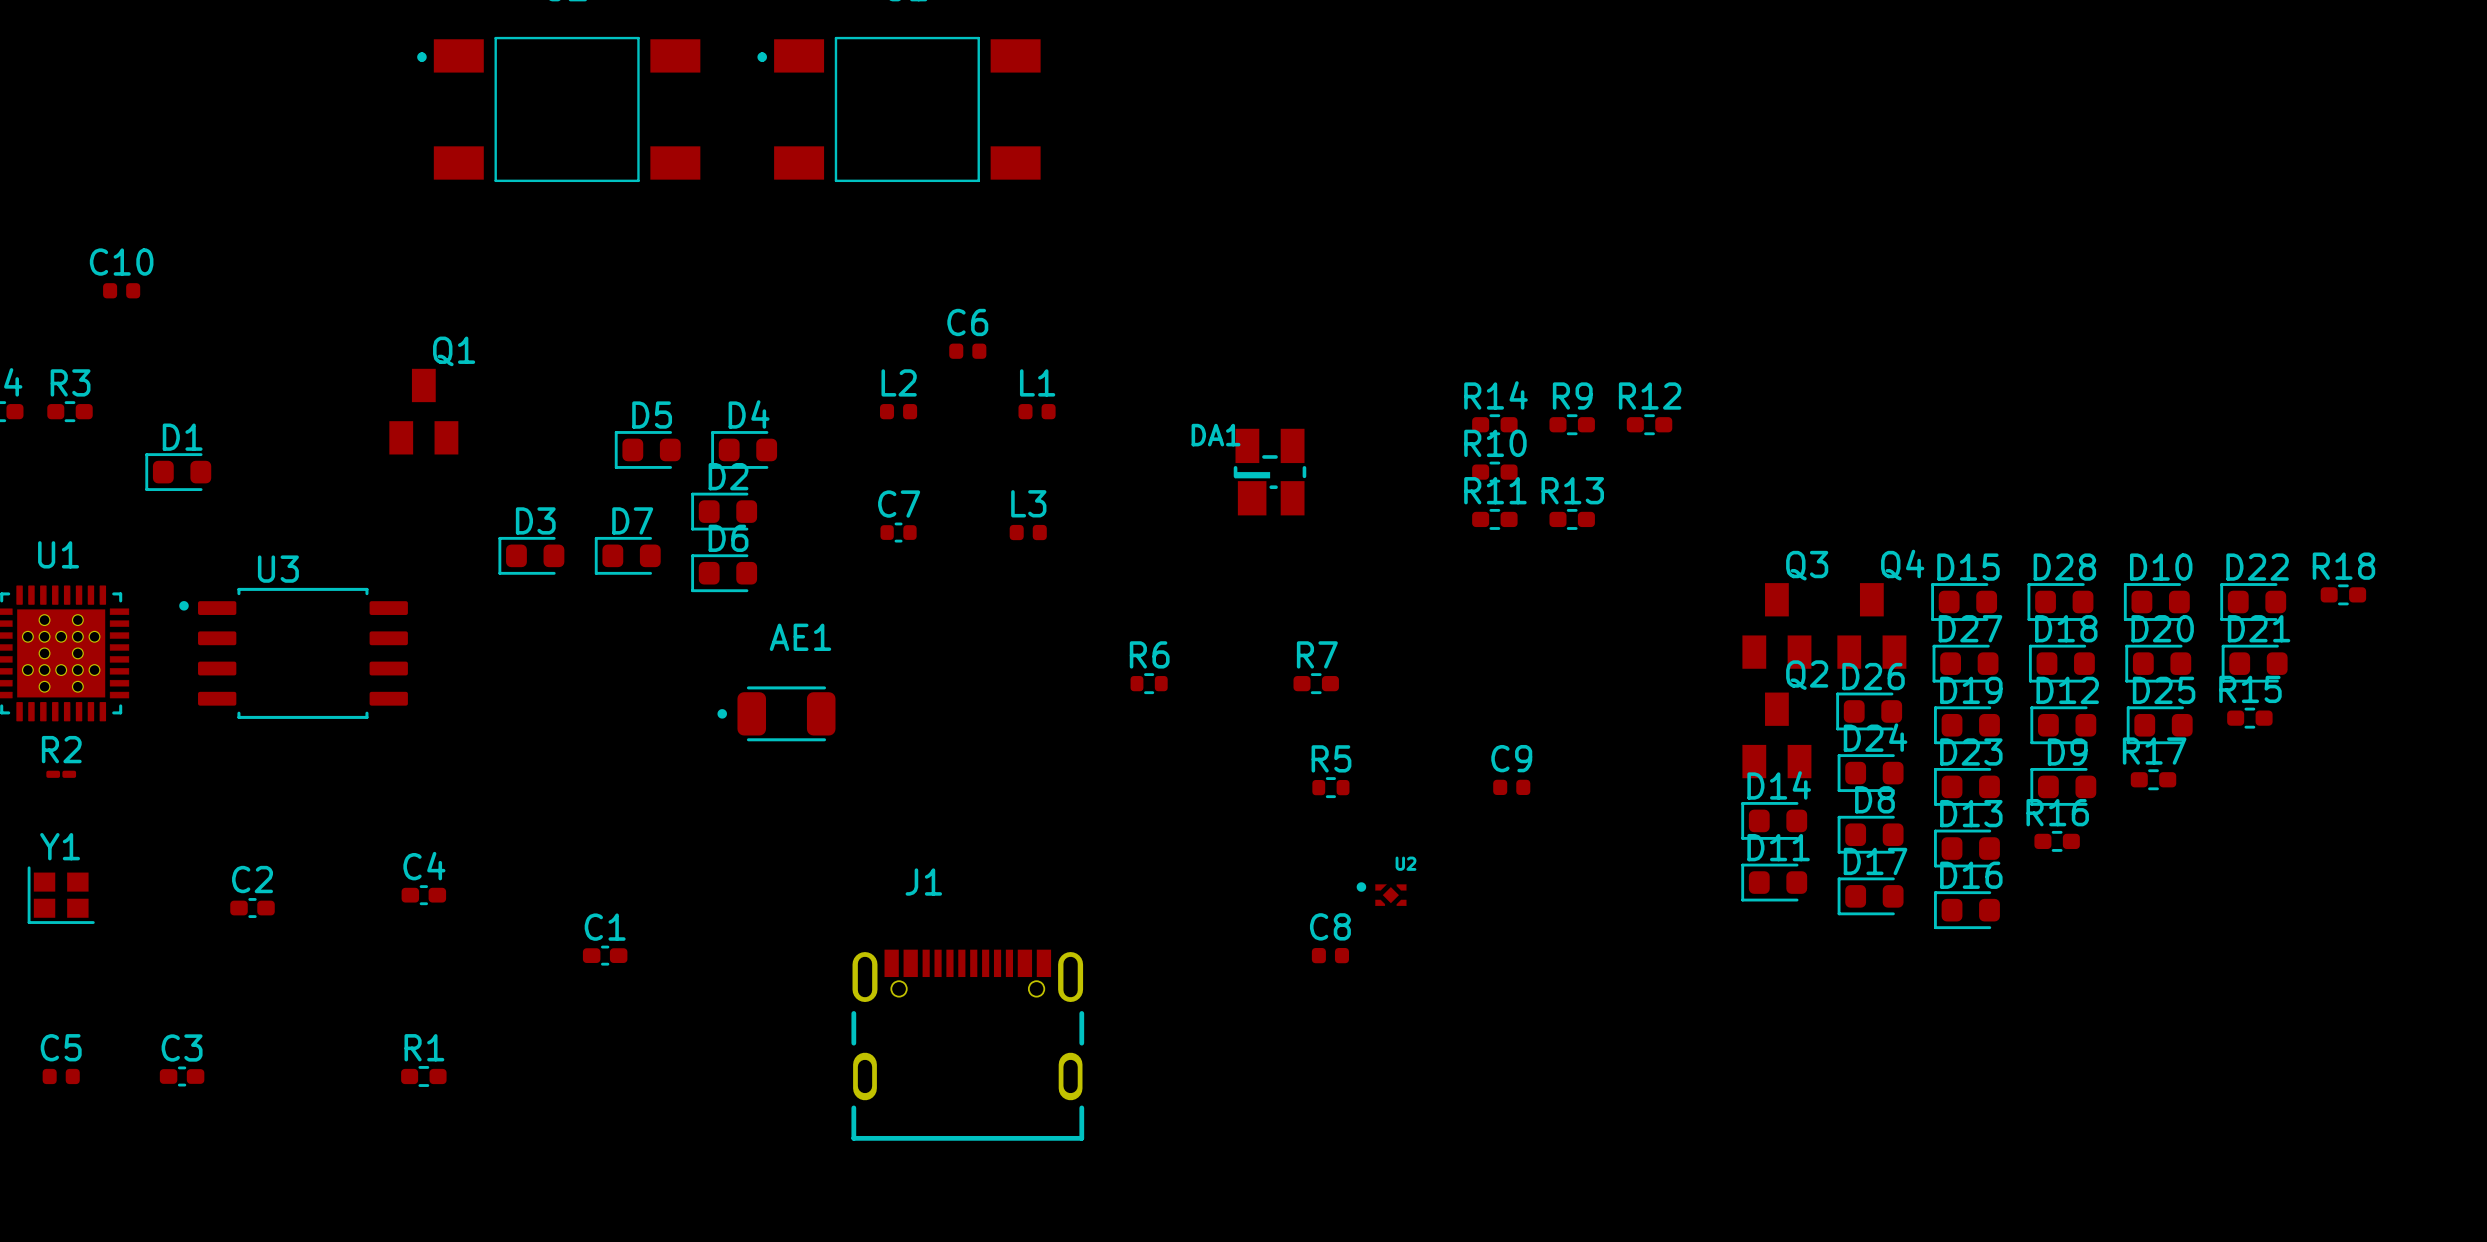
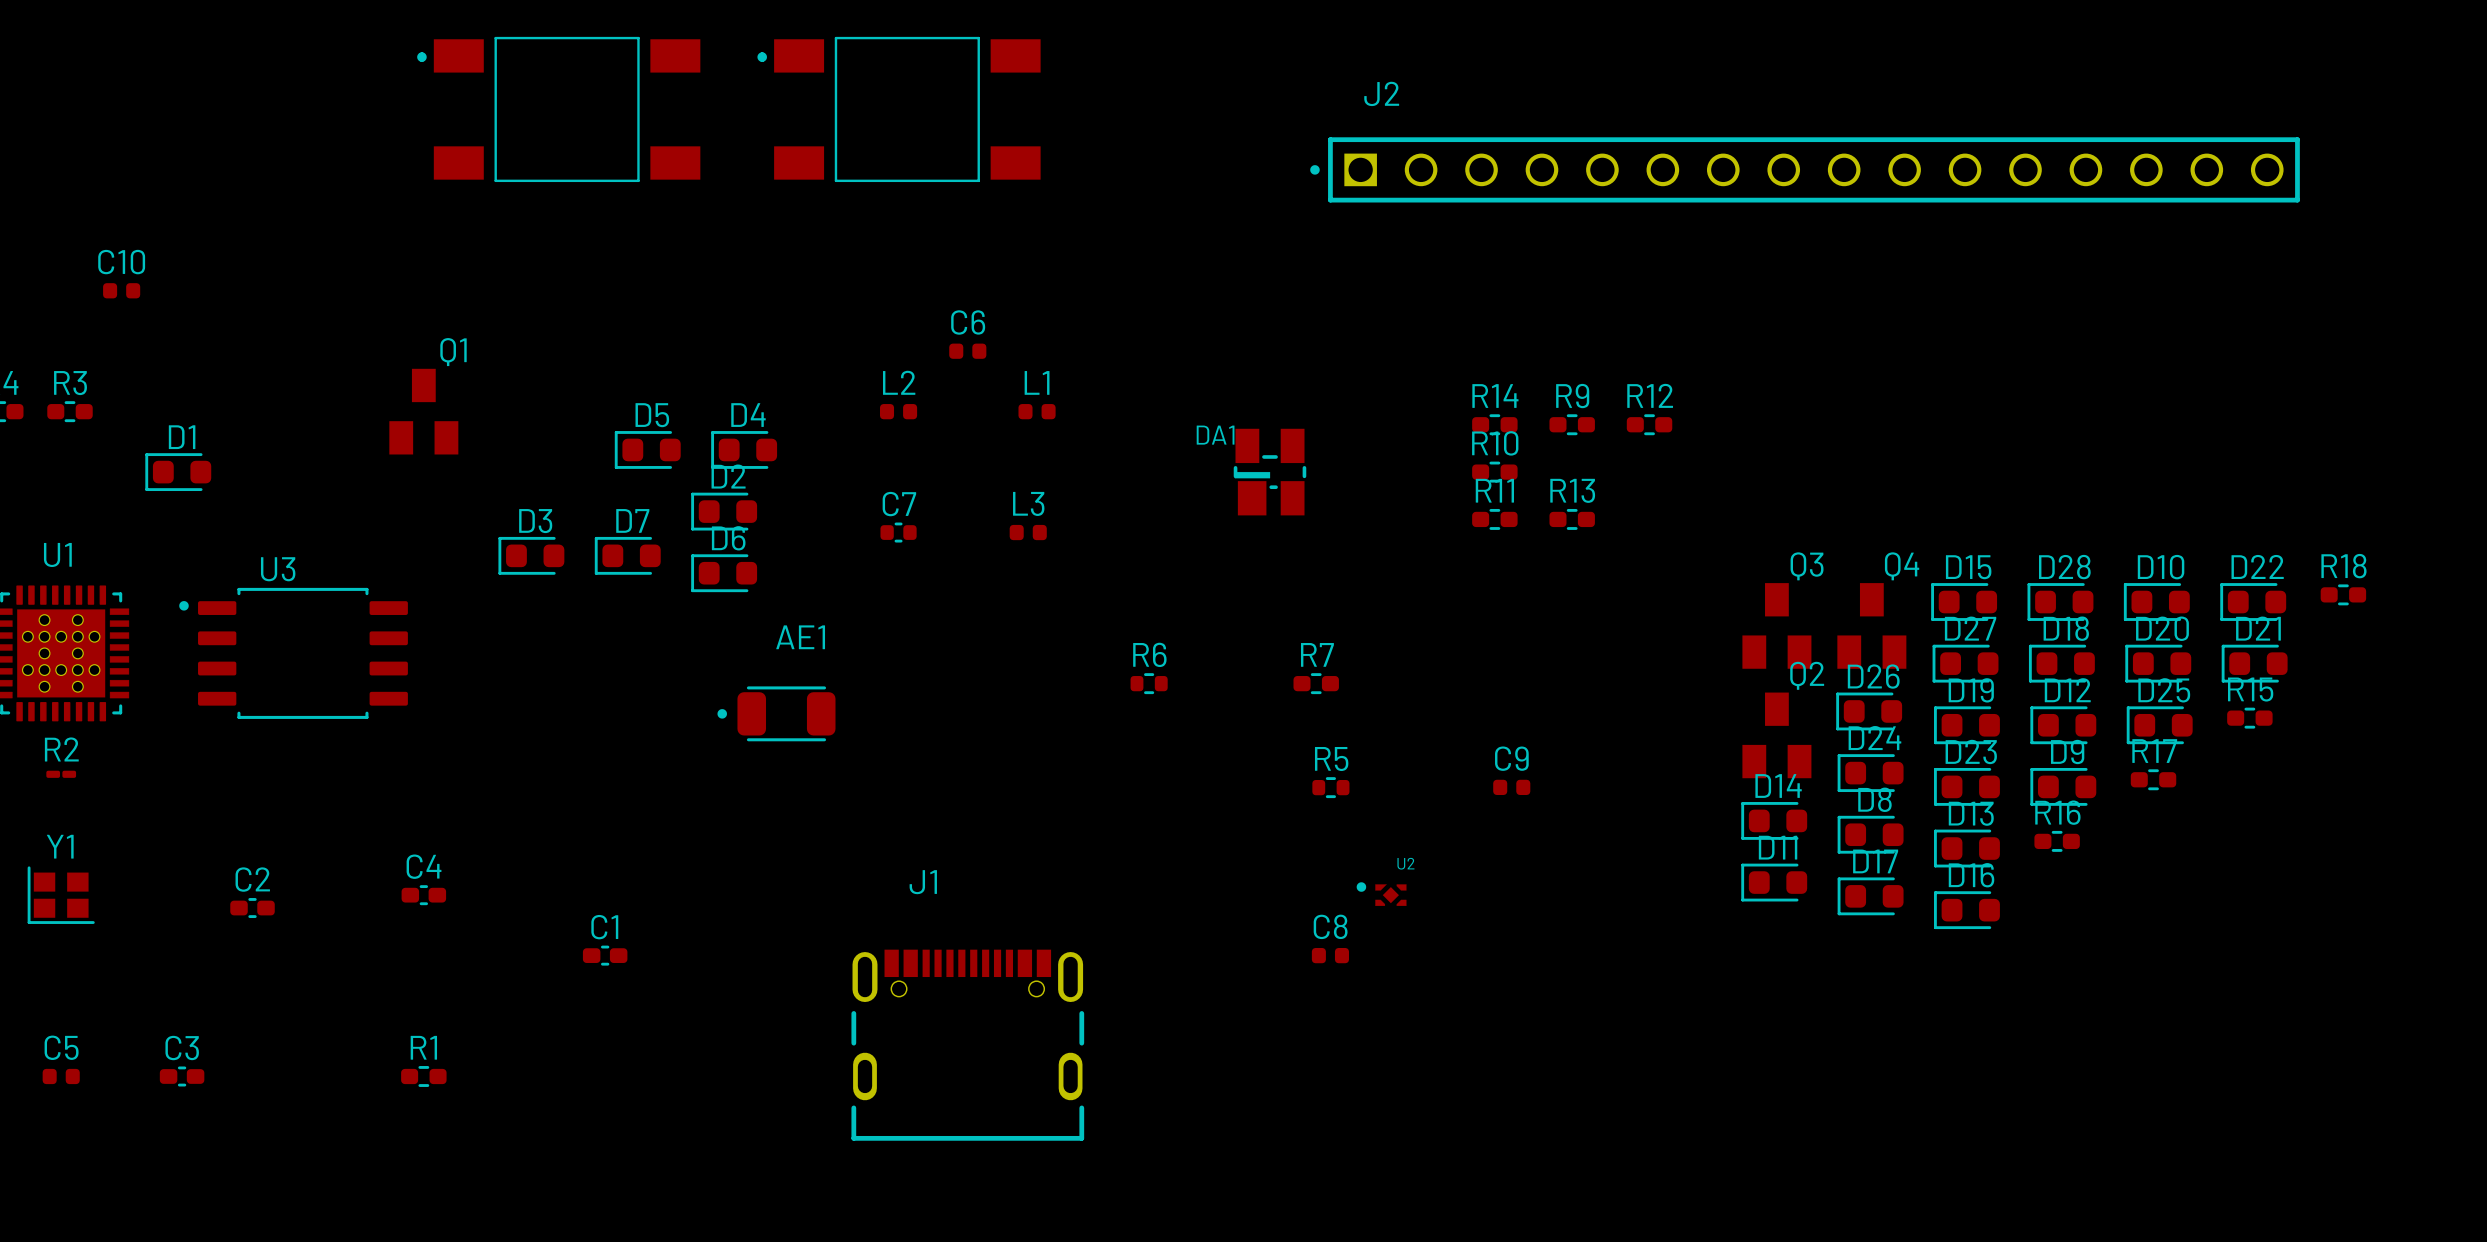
J2: none -> (1805, 169)

